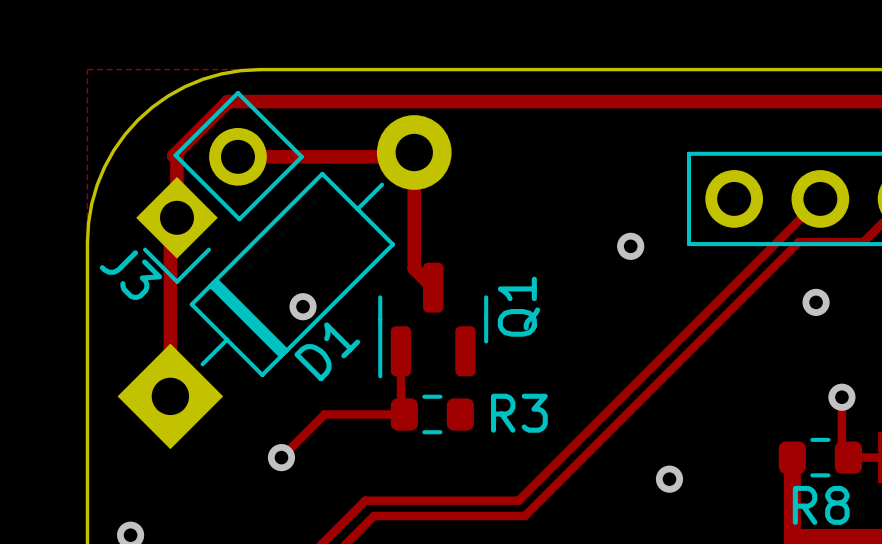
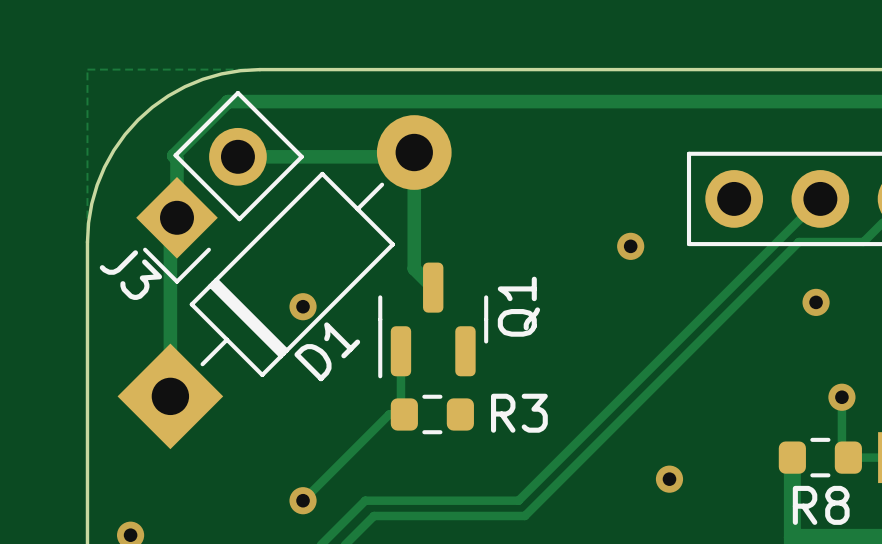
track: (389, 414) (324, 414) (281, 457) -> (389, 414) (303, 500)
via position: (281, 457) -> (303, 500)

